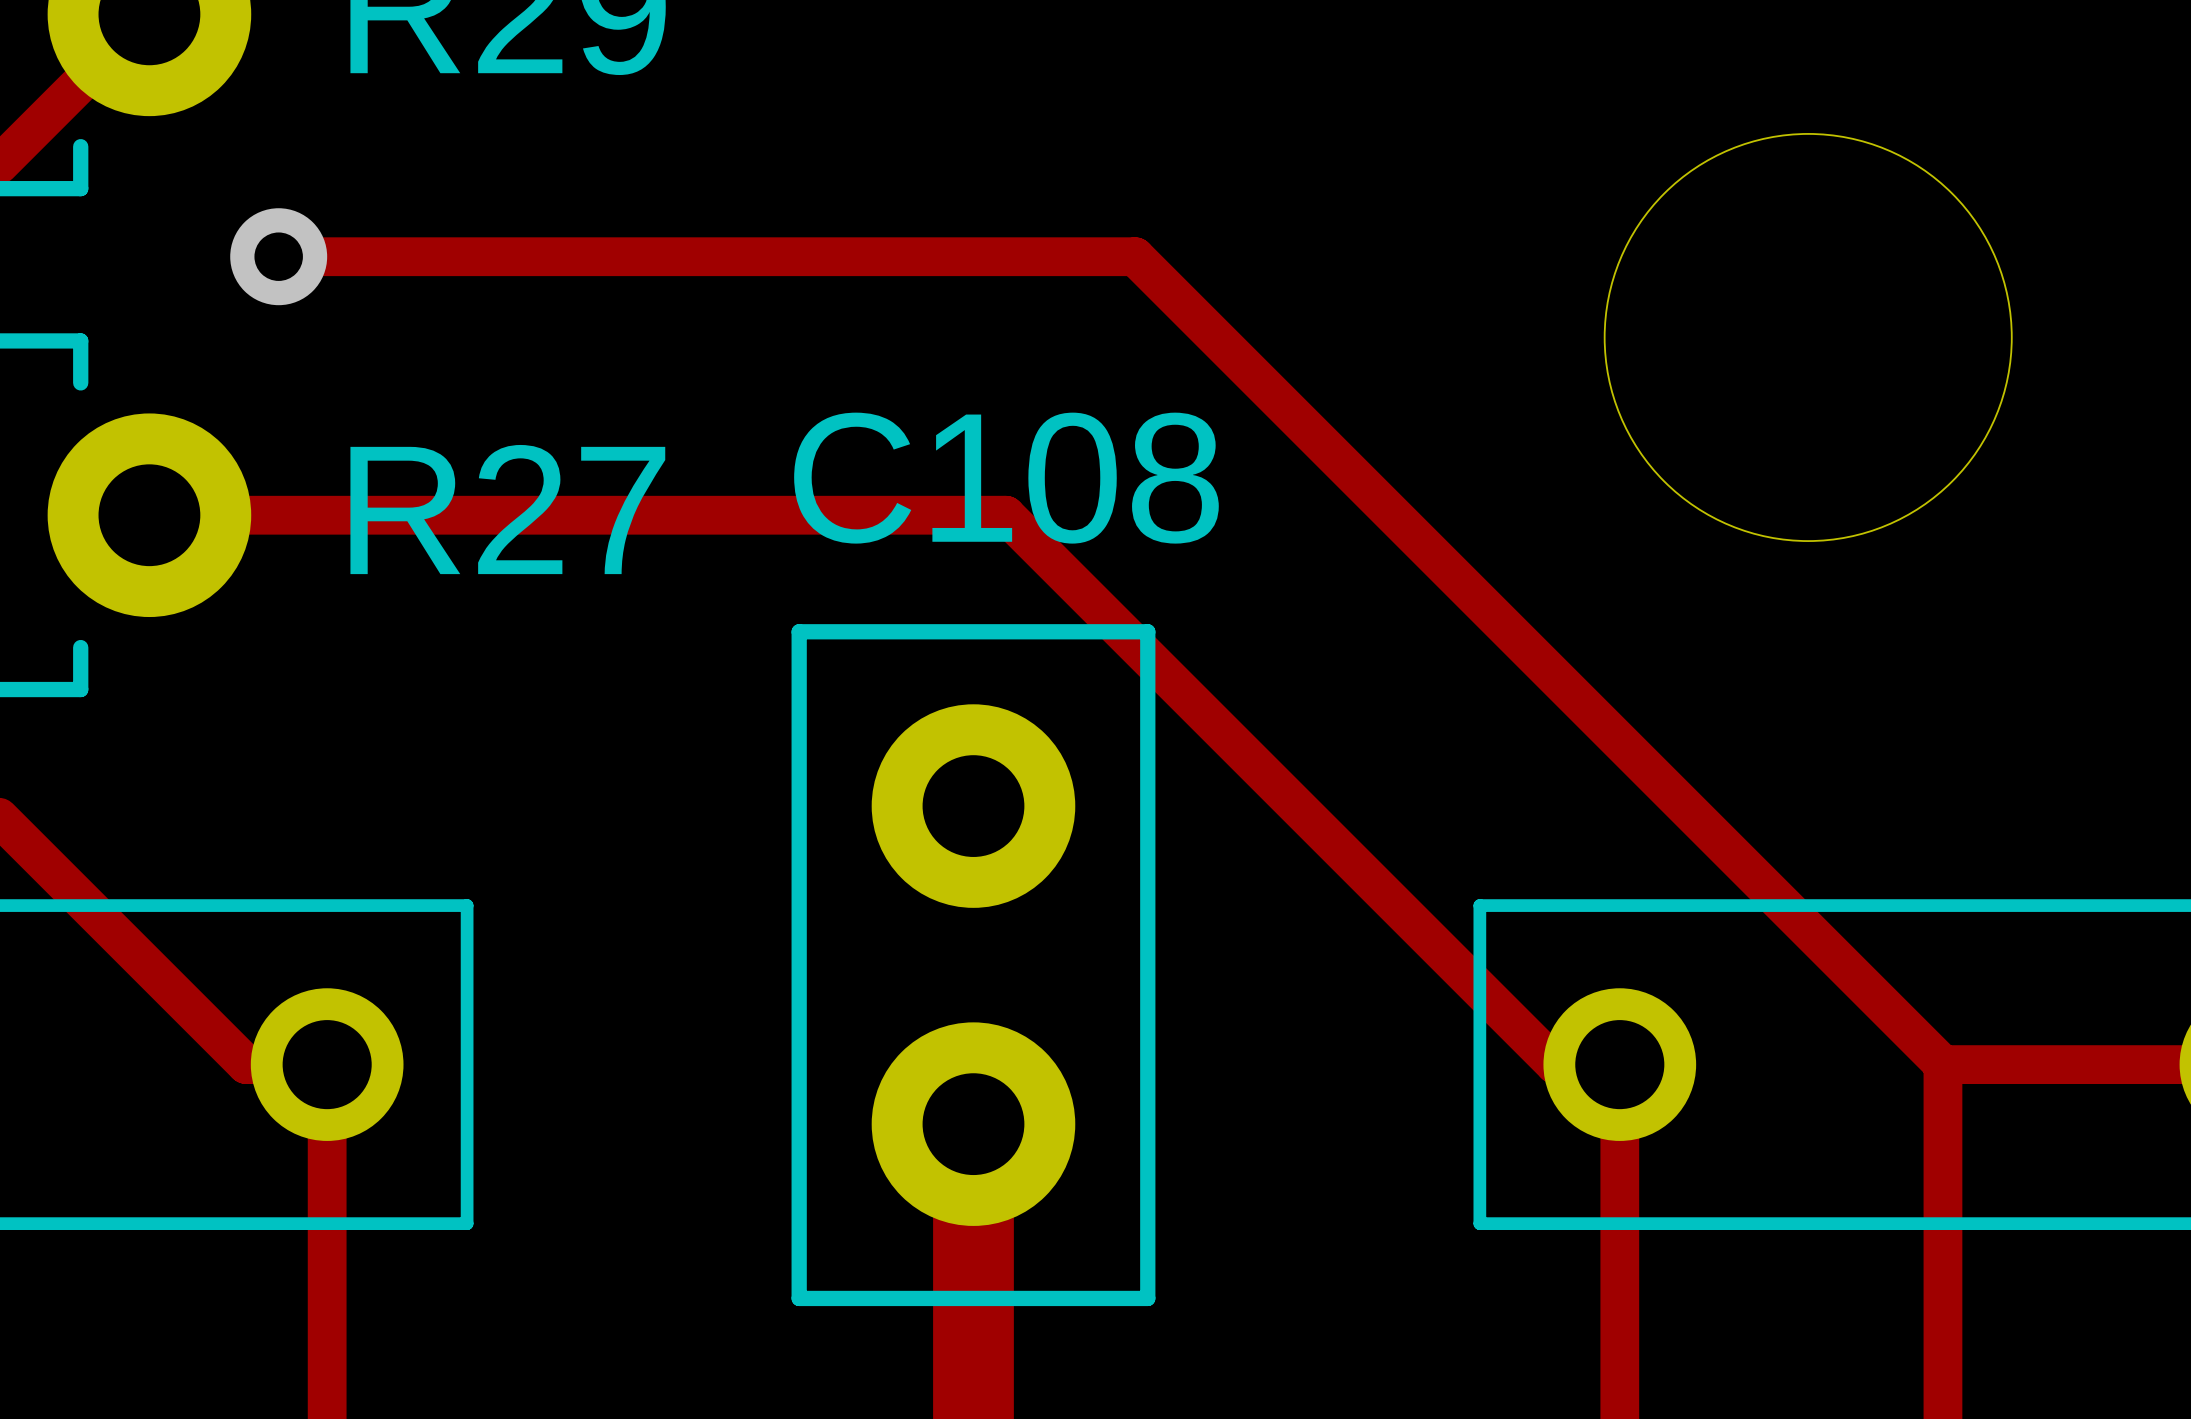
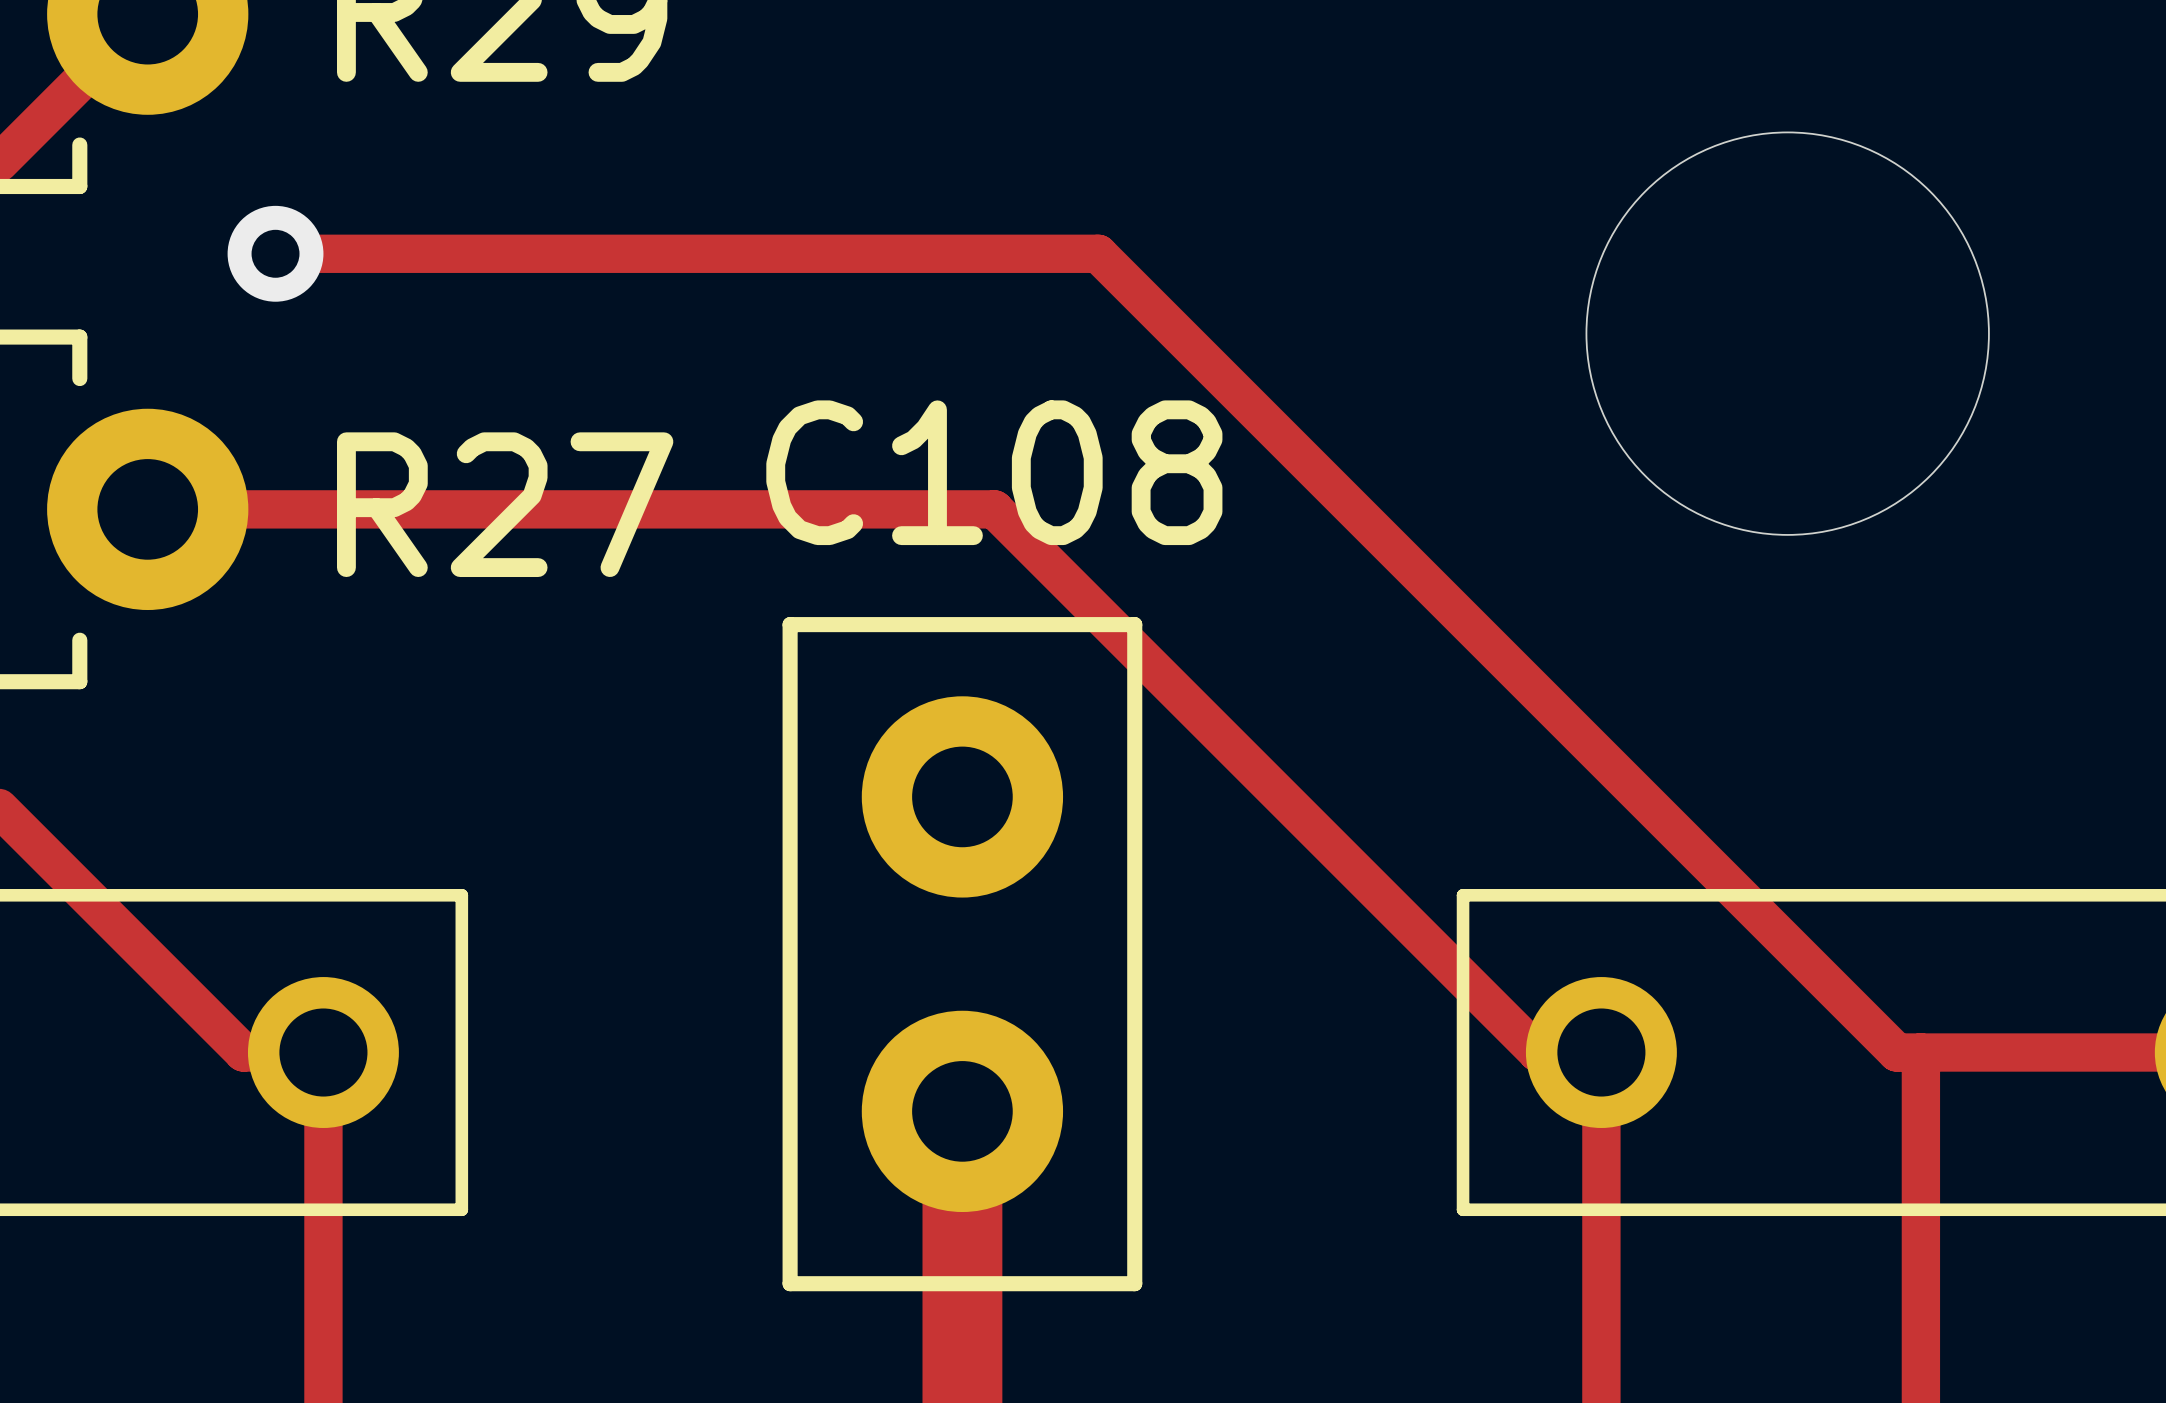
track: (1110, 256) (1135, 256) (1942, 1064) -> (1098, 253) (1896, 1052) (1920, 1052)

